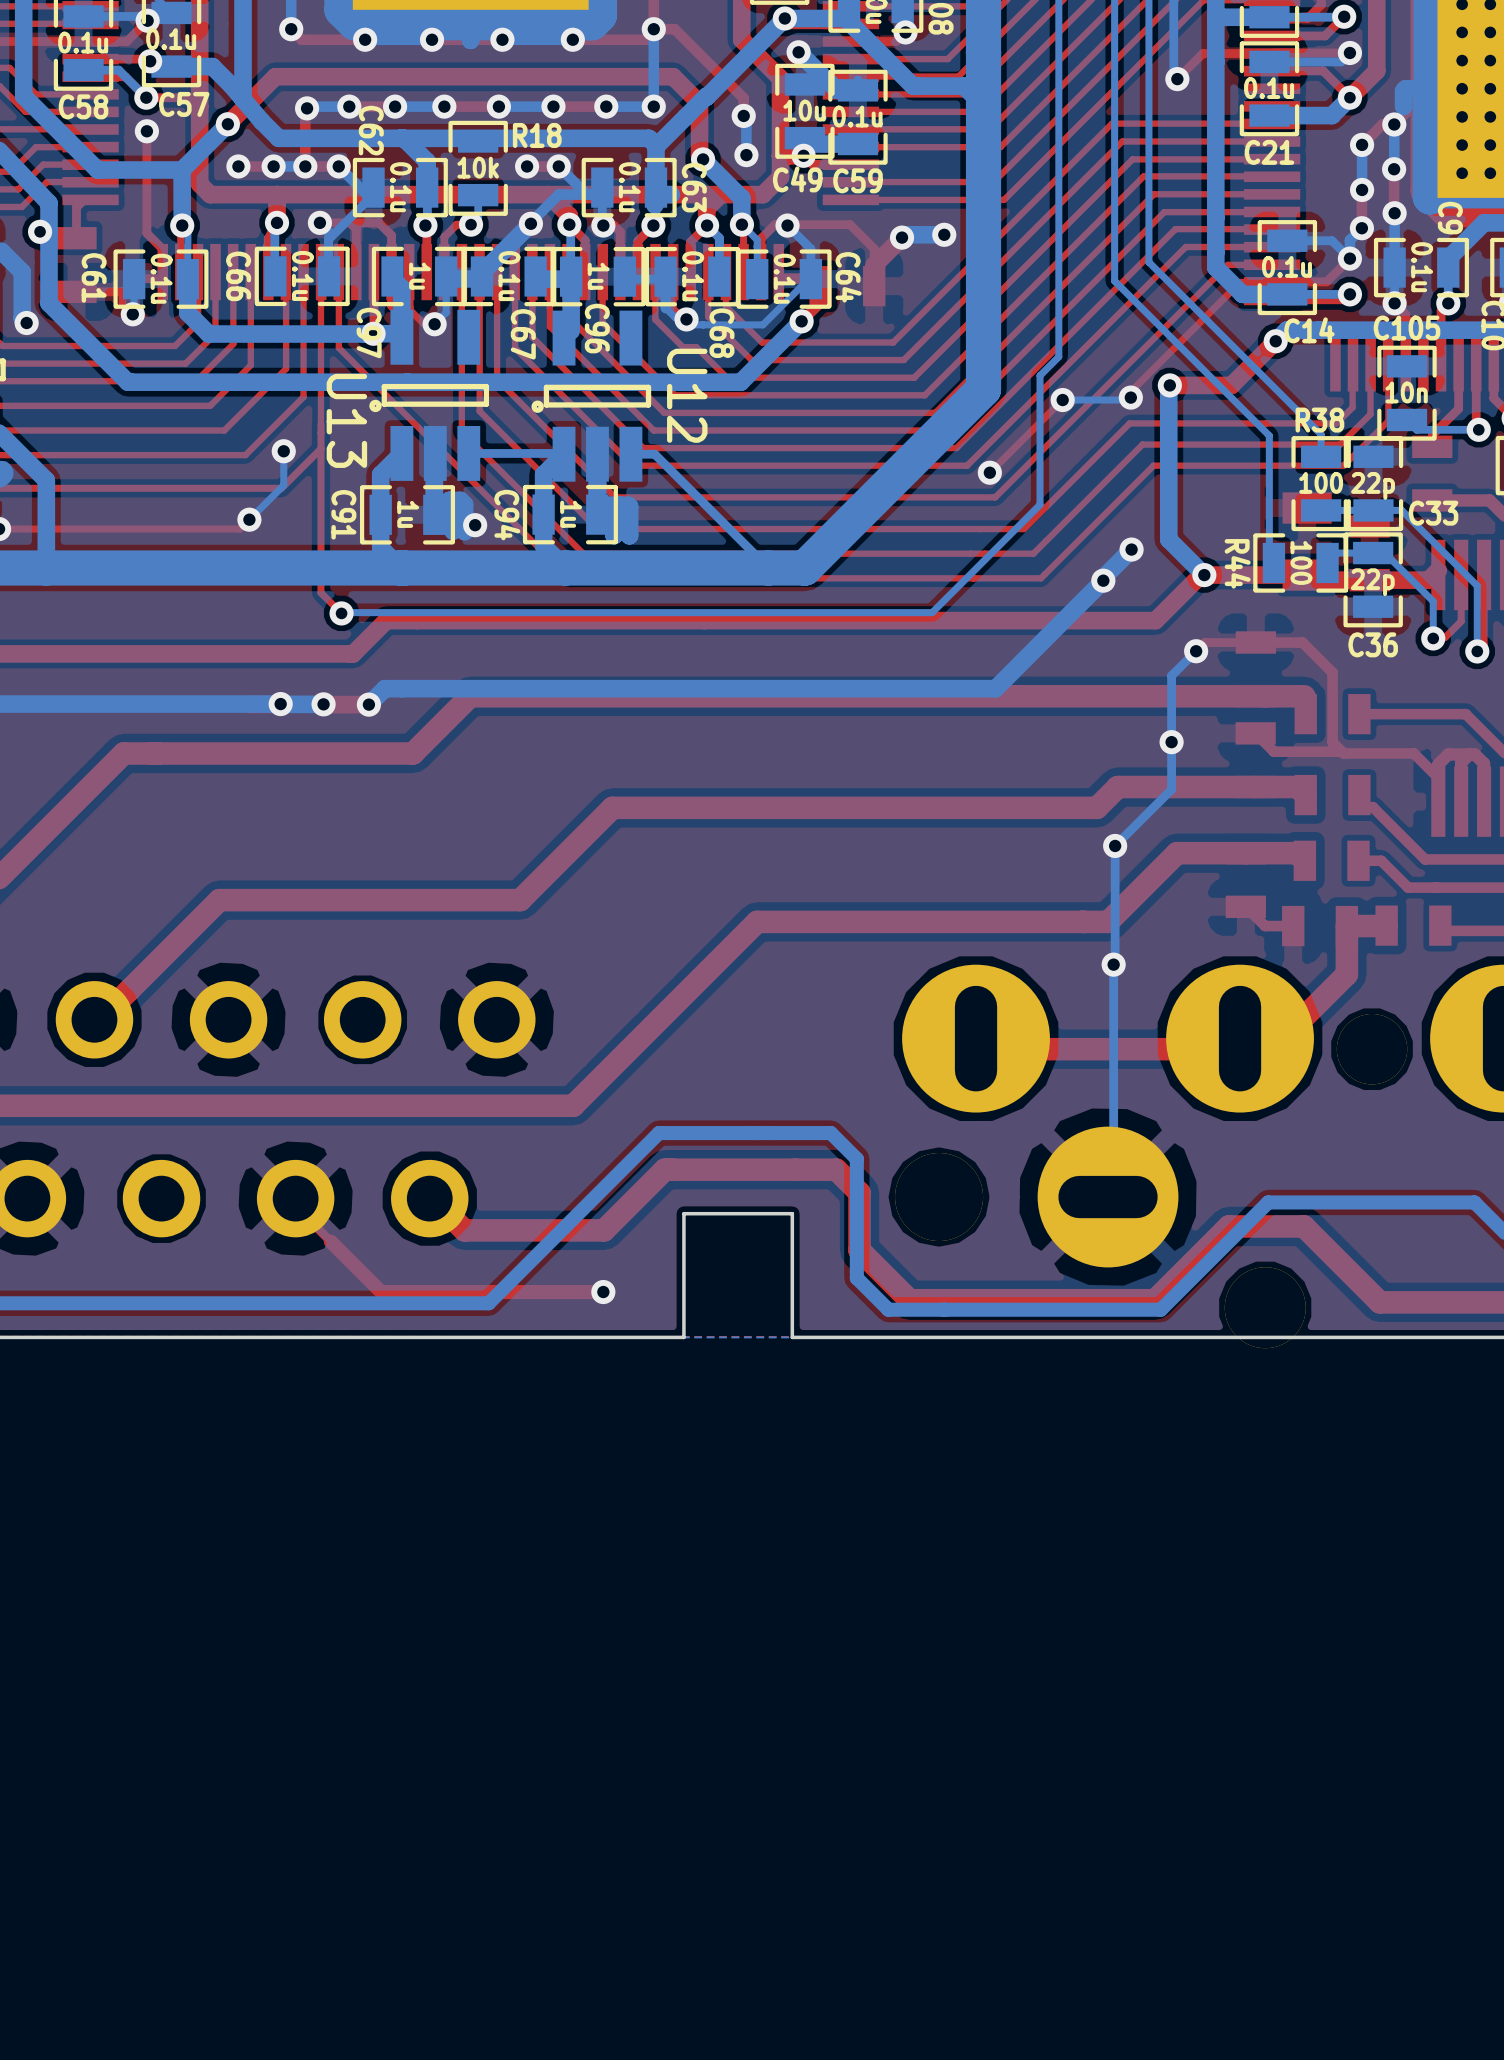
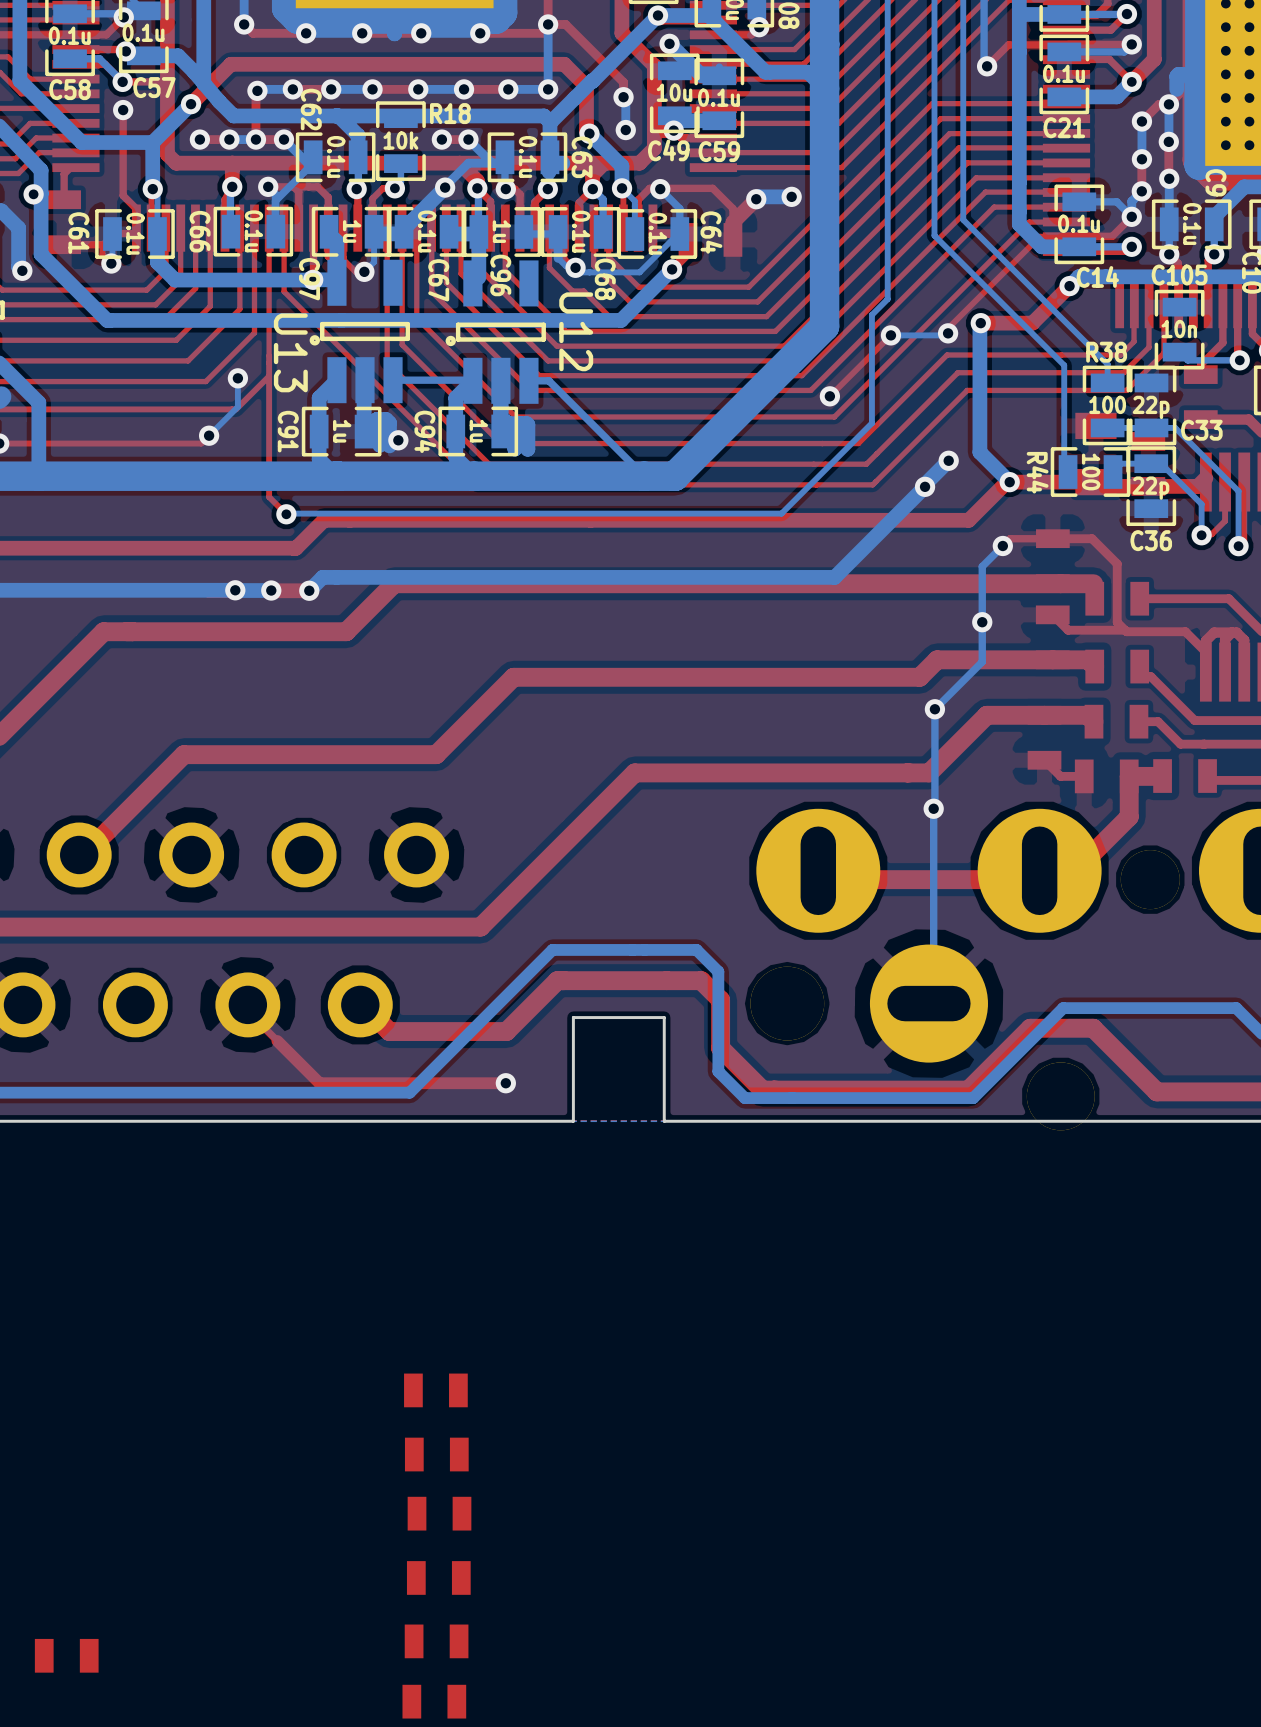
part: none -> (435, 1390)
part: none -> (436, 1454)
part: none -> (439, 1513)
part: none -> (438, 1577)
part: none -> (436, 1641)
part: none -> (66, 1655)
part: none -> (434, 1701)

